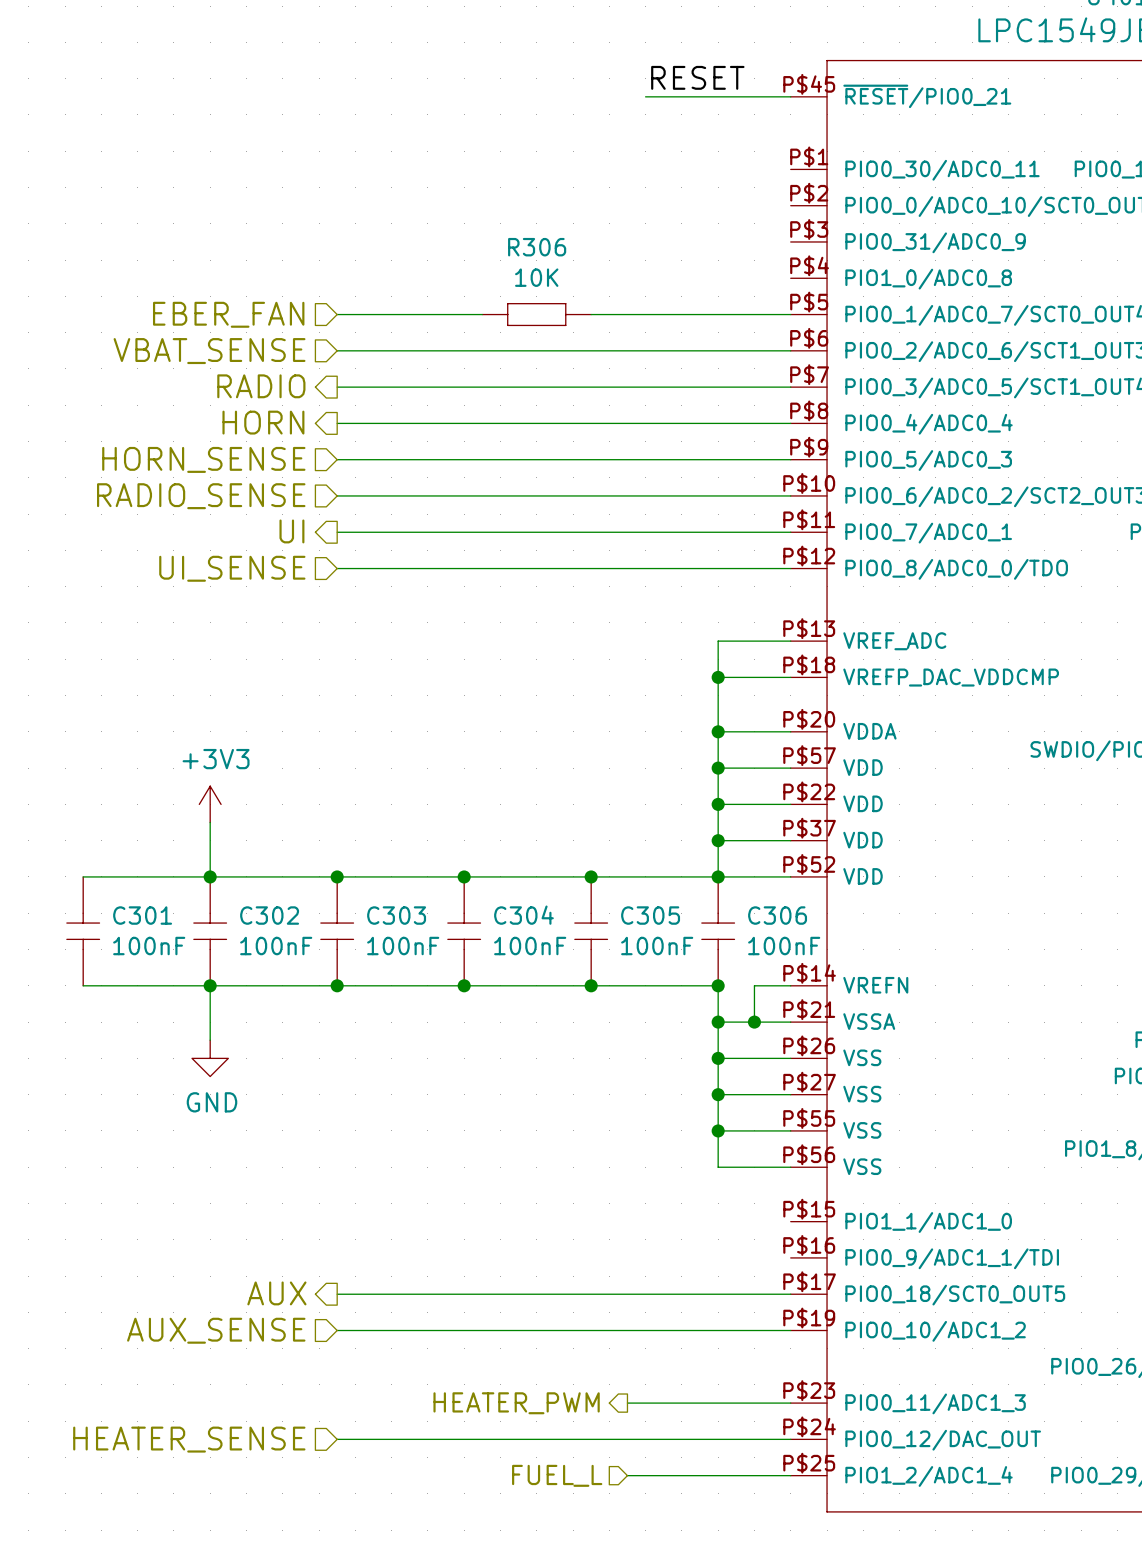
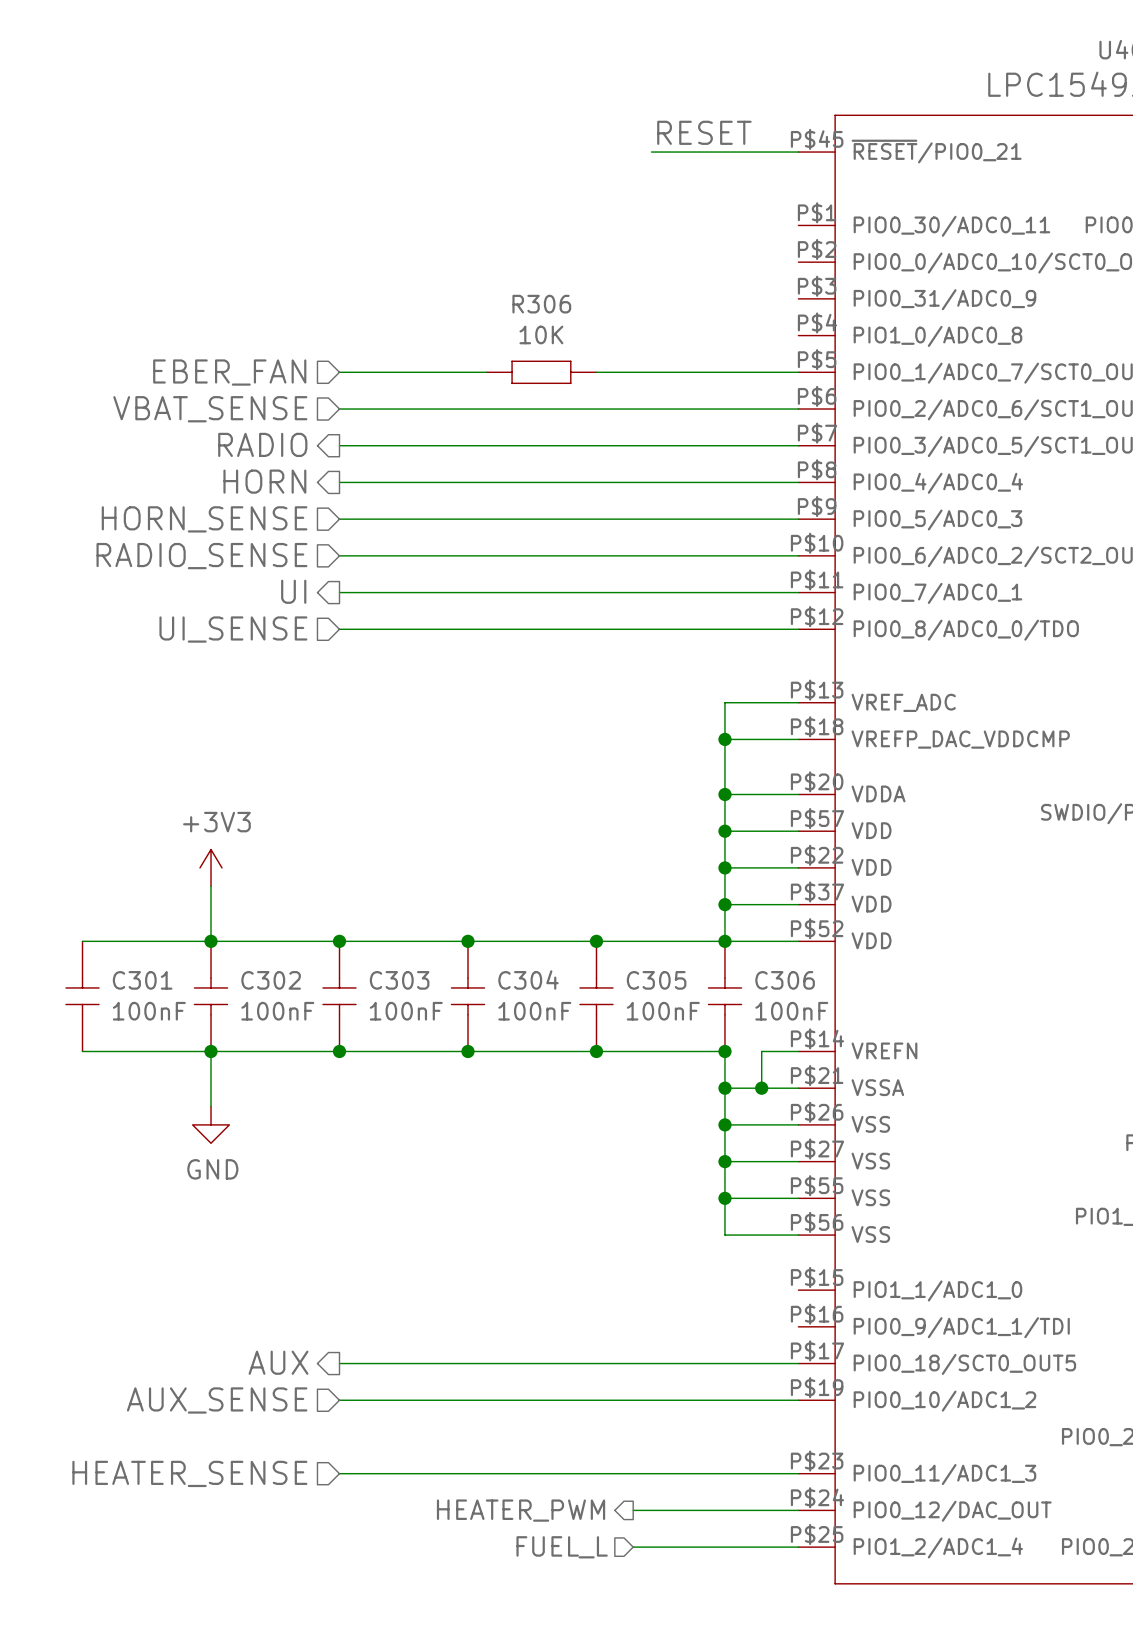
hierarchical label position: HEATER_PWM (516, 1403) -> HEATER_PWM (521, 1510)
hierarchical label position: HEATER_SENSE (189, 1439) -> HEATER_SENSE (189, 1473)
wire: (337, 1439) (627, 1439) -> (339, 1473) (633, 1473)

